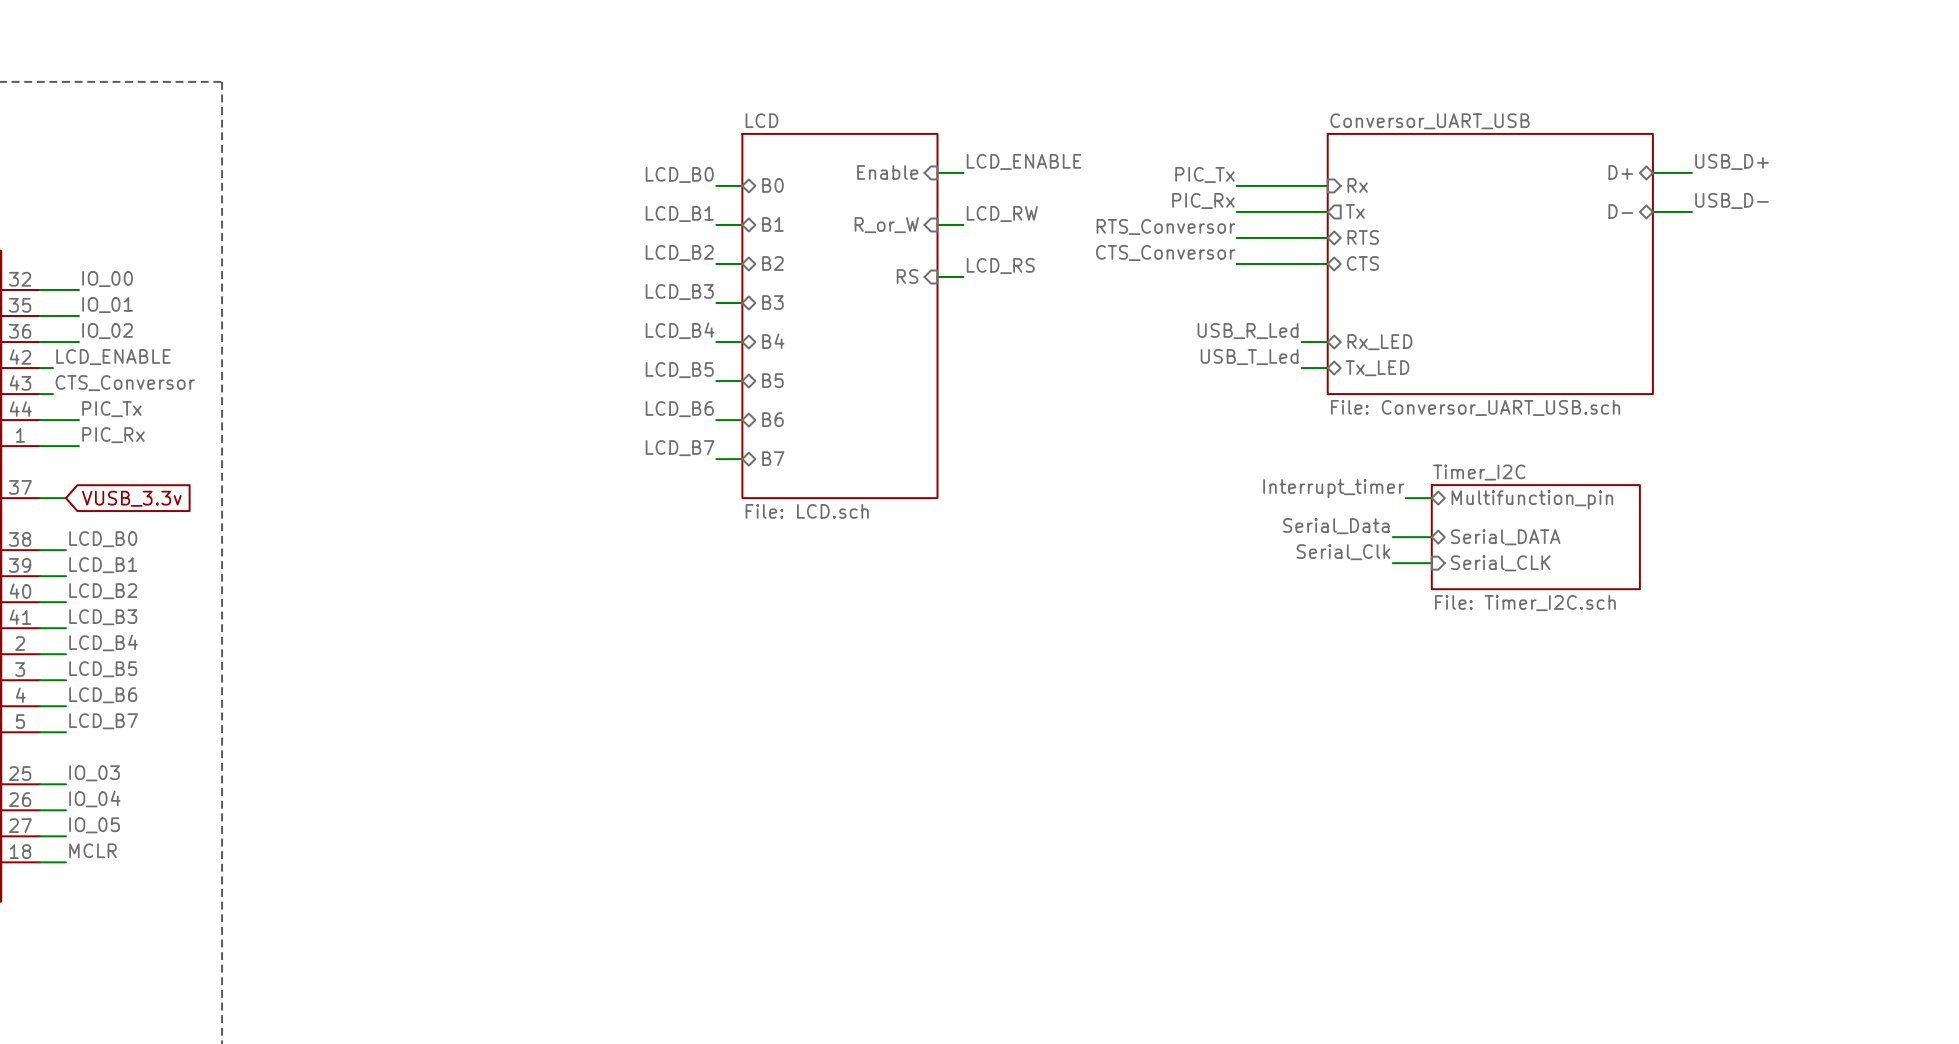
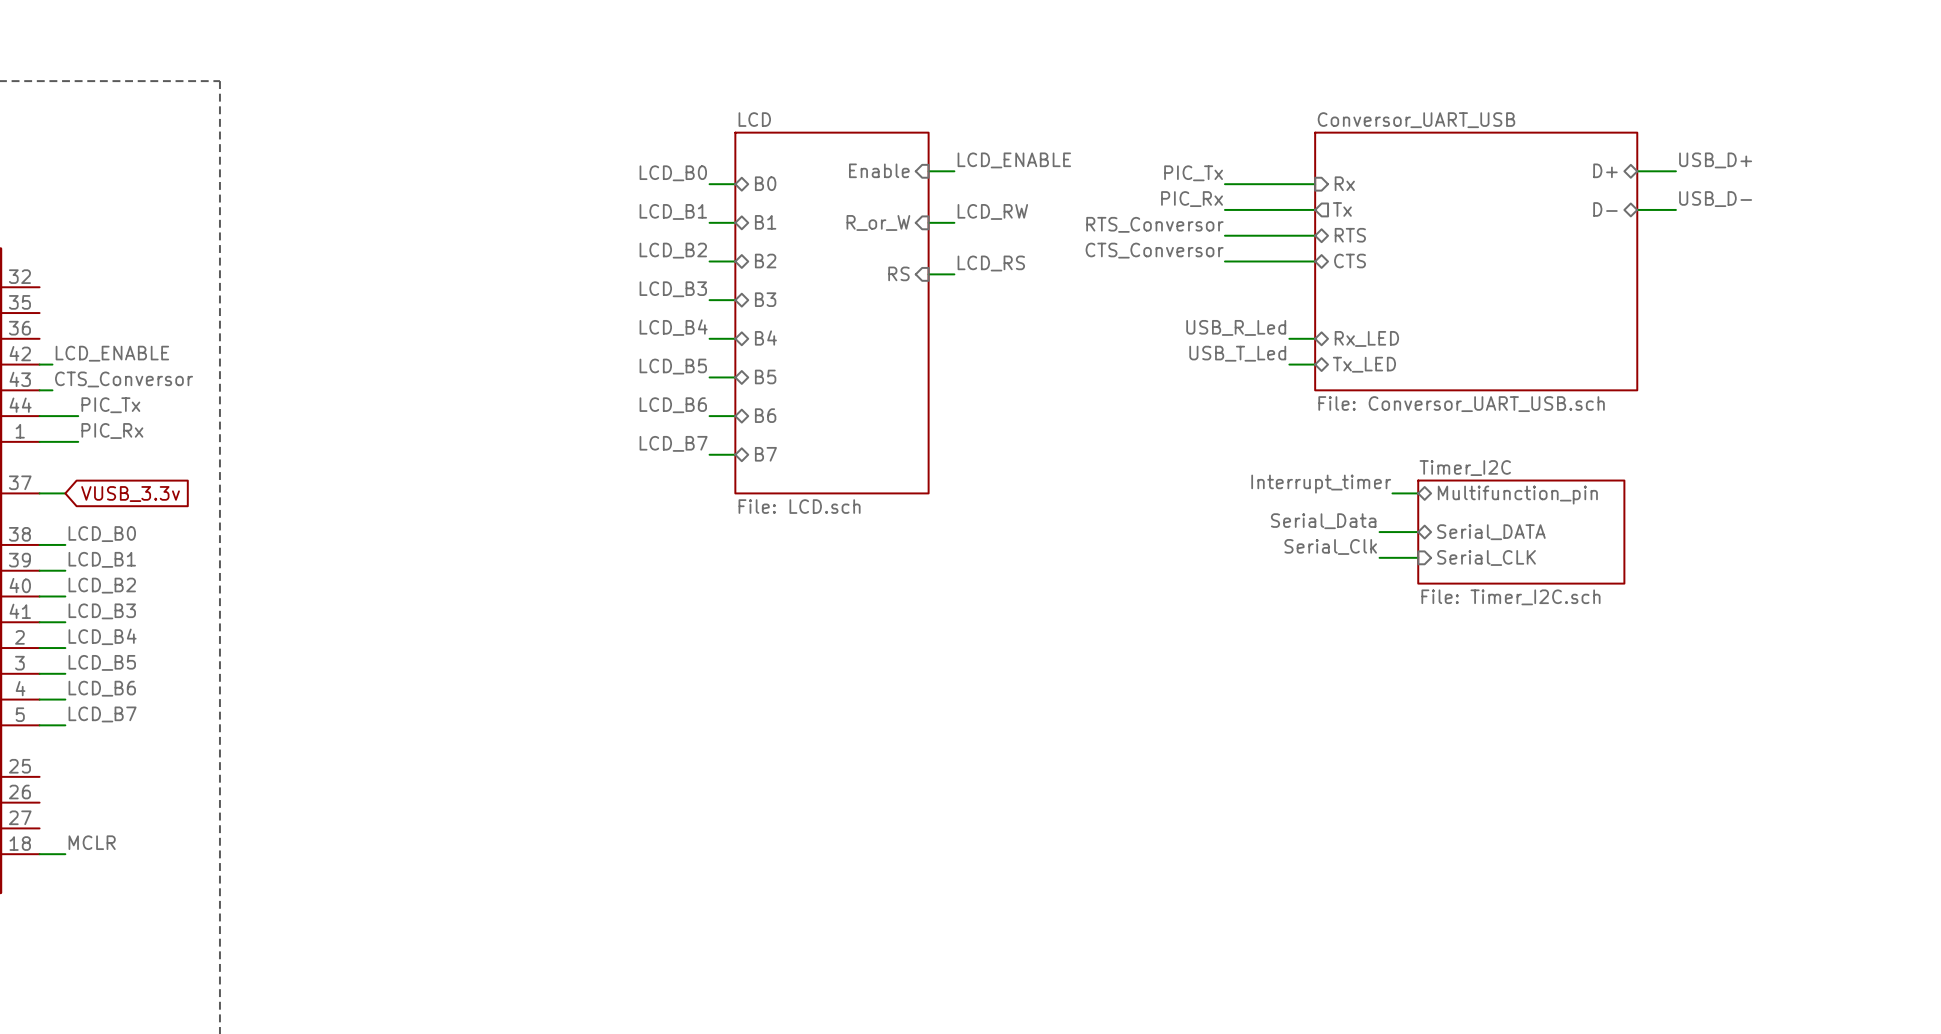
label: IO_00 (107, 279) -> none
wire: (39, 290) (78, 290) -> none
label: IO_01 (107, 305) -> none
wire: (39, 316) (78, 316) -> none
label: IO_02 (107, 331) -> none
wire: (39, 342) (78, 342) -> none
label: IO_03 (94, 773) -> none
wire: (39, 784) (65, 784) -> none
label: IO_04 (94, 799) -> none
wire: (39, 810) (65, 810) -> none
label: IO_05 (94, 825) -> none
wire: (39, 836) (65, 836) -> none

